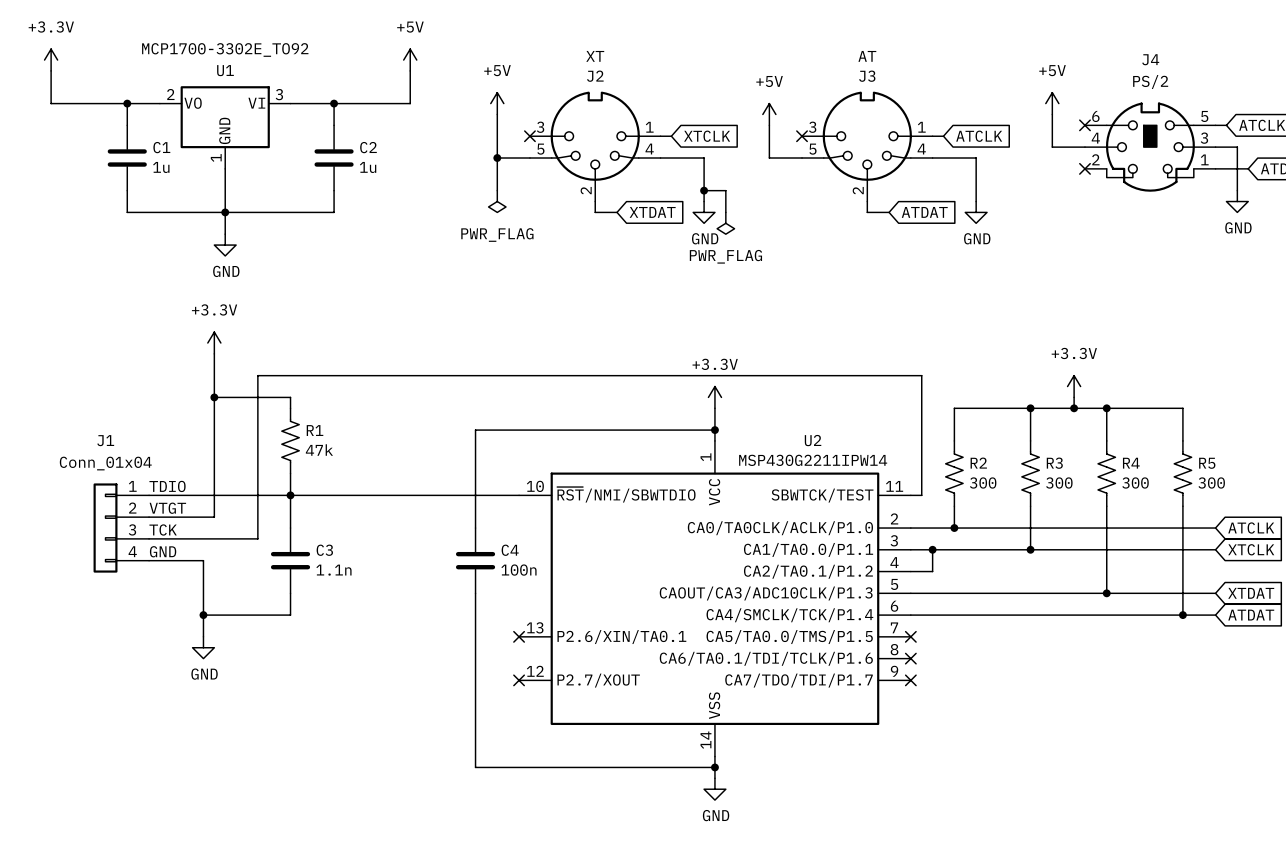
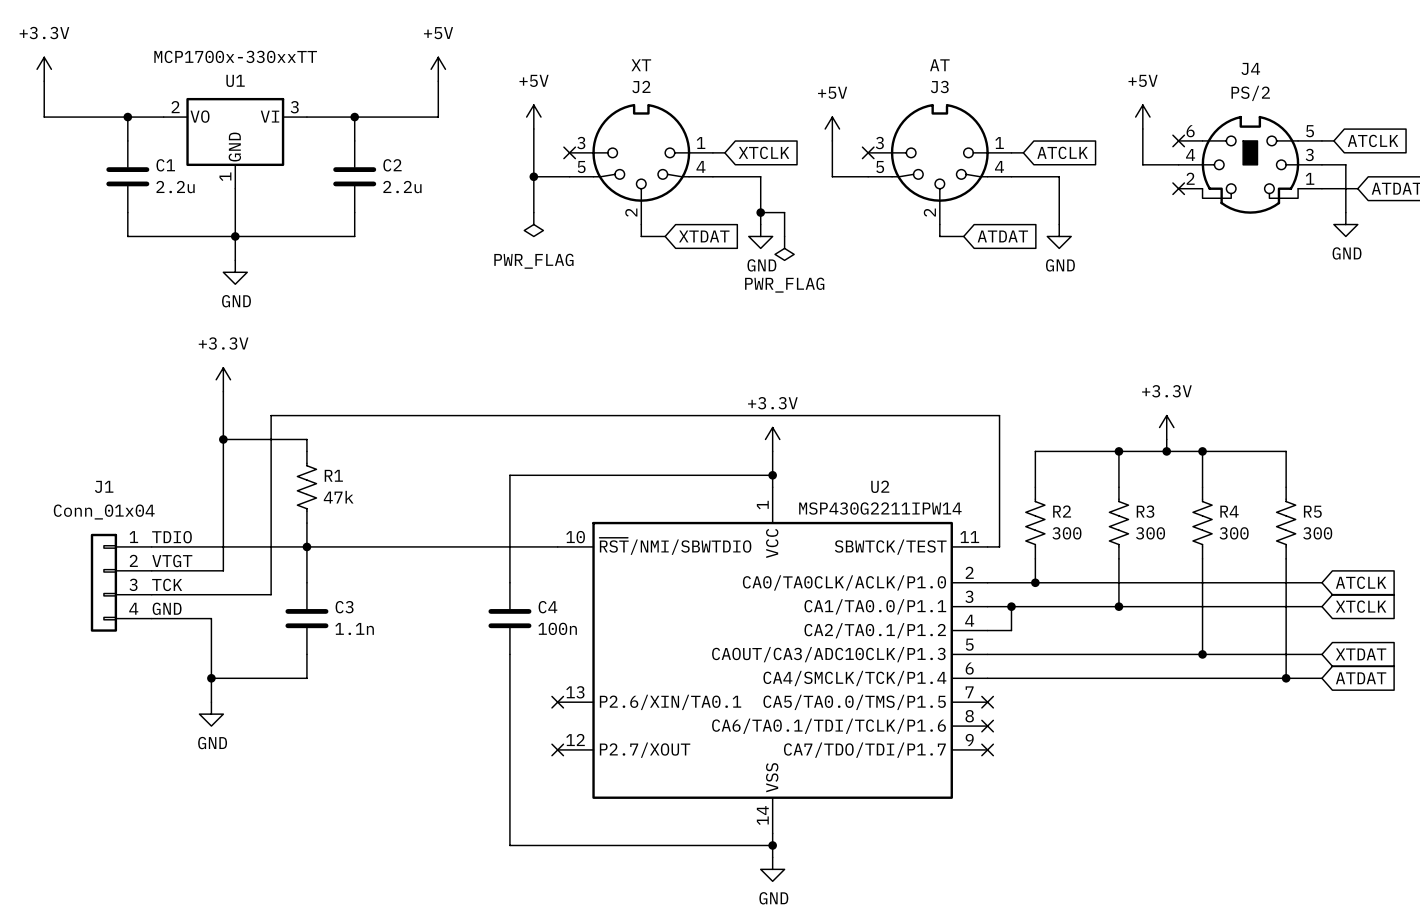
U1 value: MCP1700-3302E_TO92 (225, 49) -> MCP1700x-330xxTT (235, 56)
C1 value: 1u (161, 167) -> 2.2u (175, 187)
C2 value: 1u (368, 167) -> 2.2u (402, 187)

